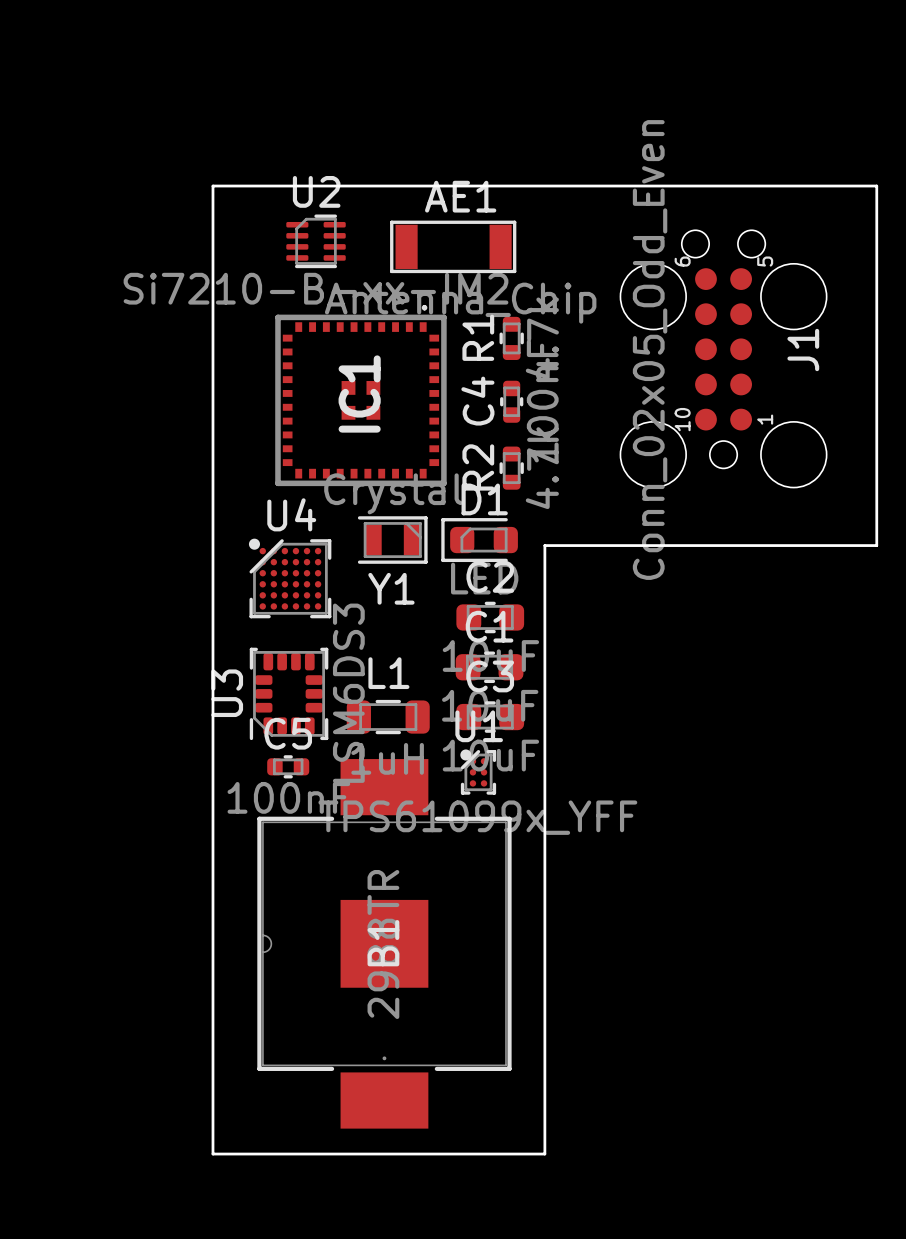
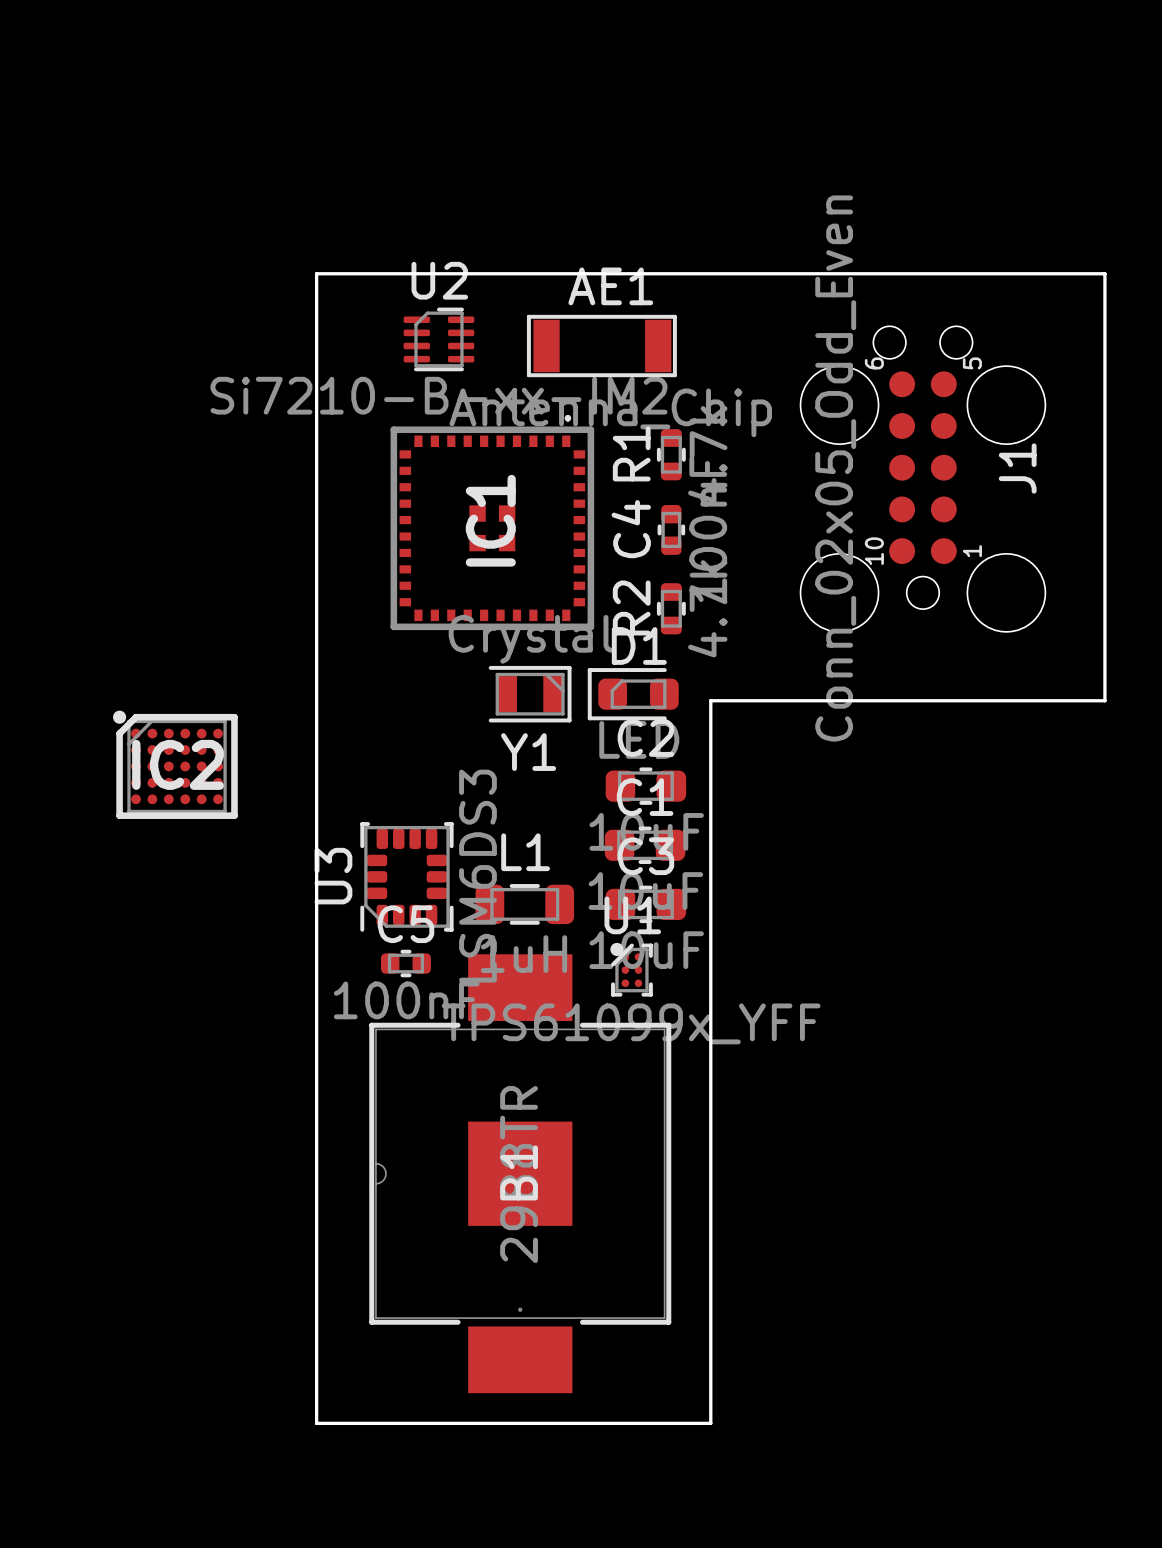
U4: (290, 578) -> none
IC2: none -> (175, 764)

